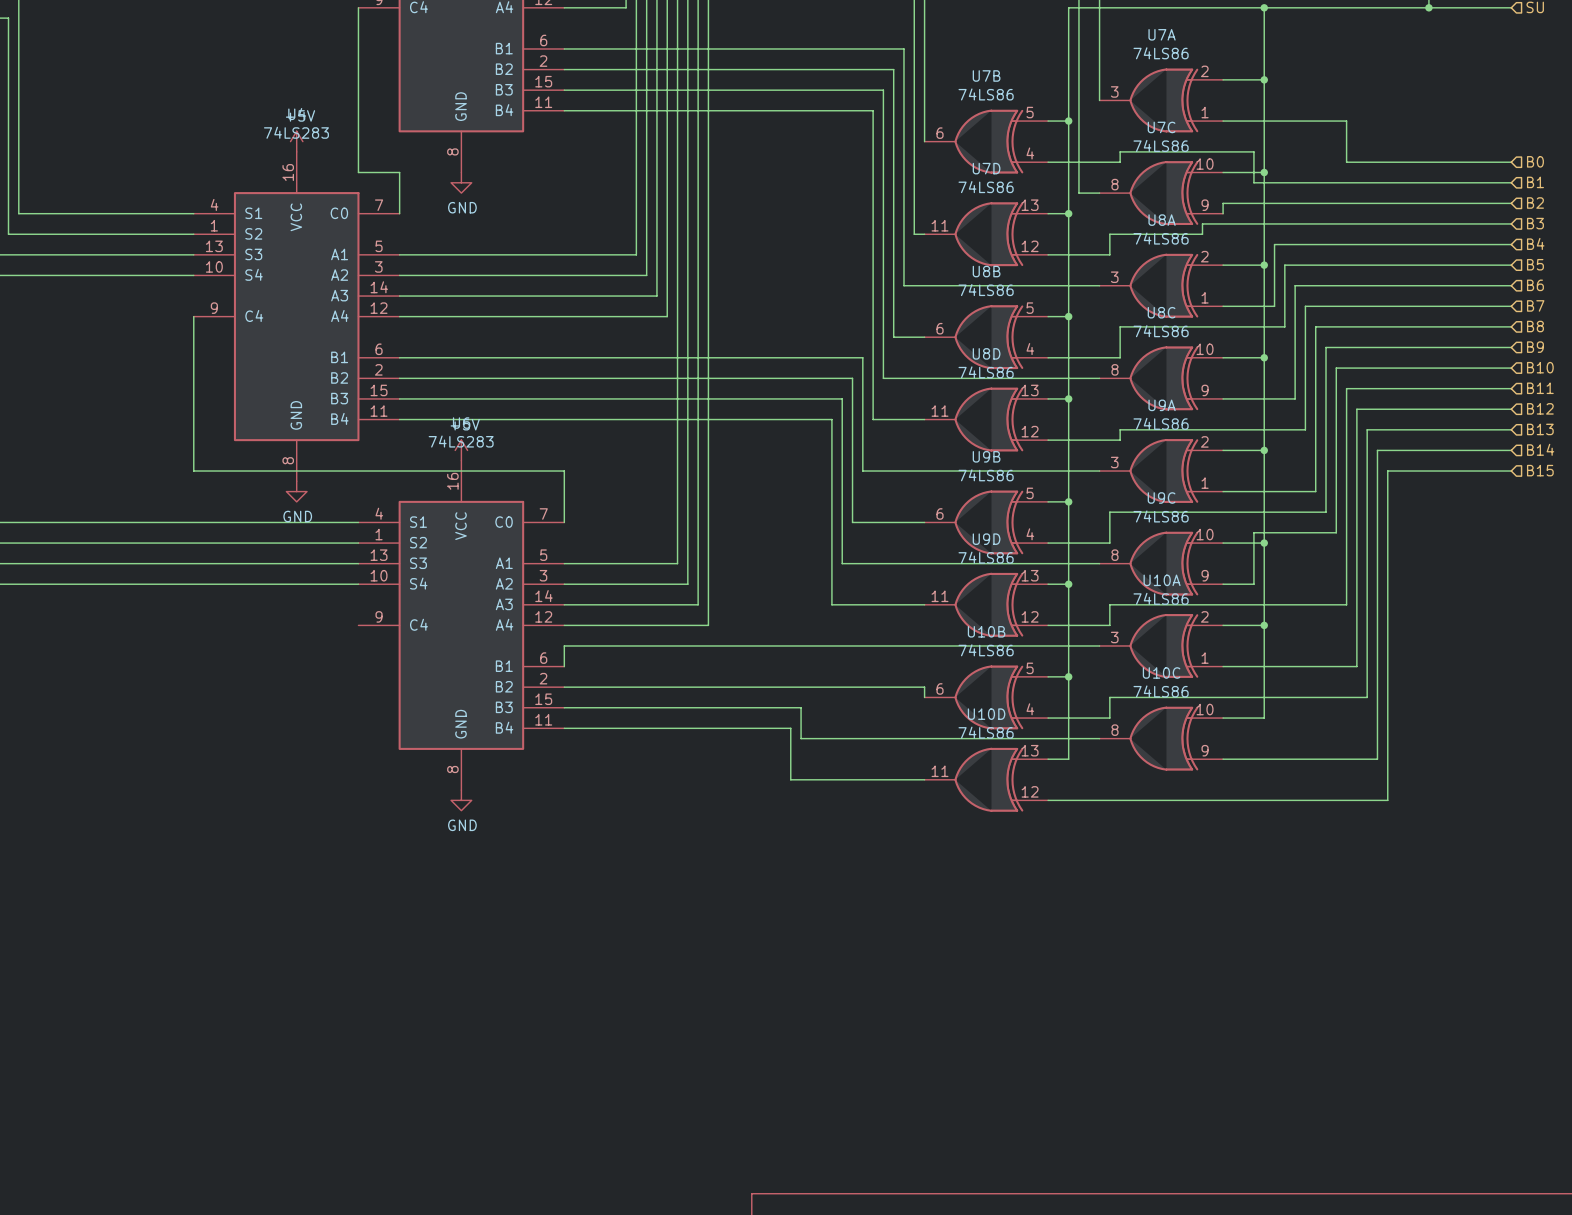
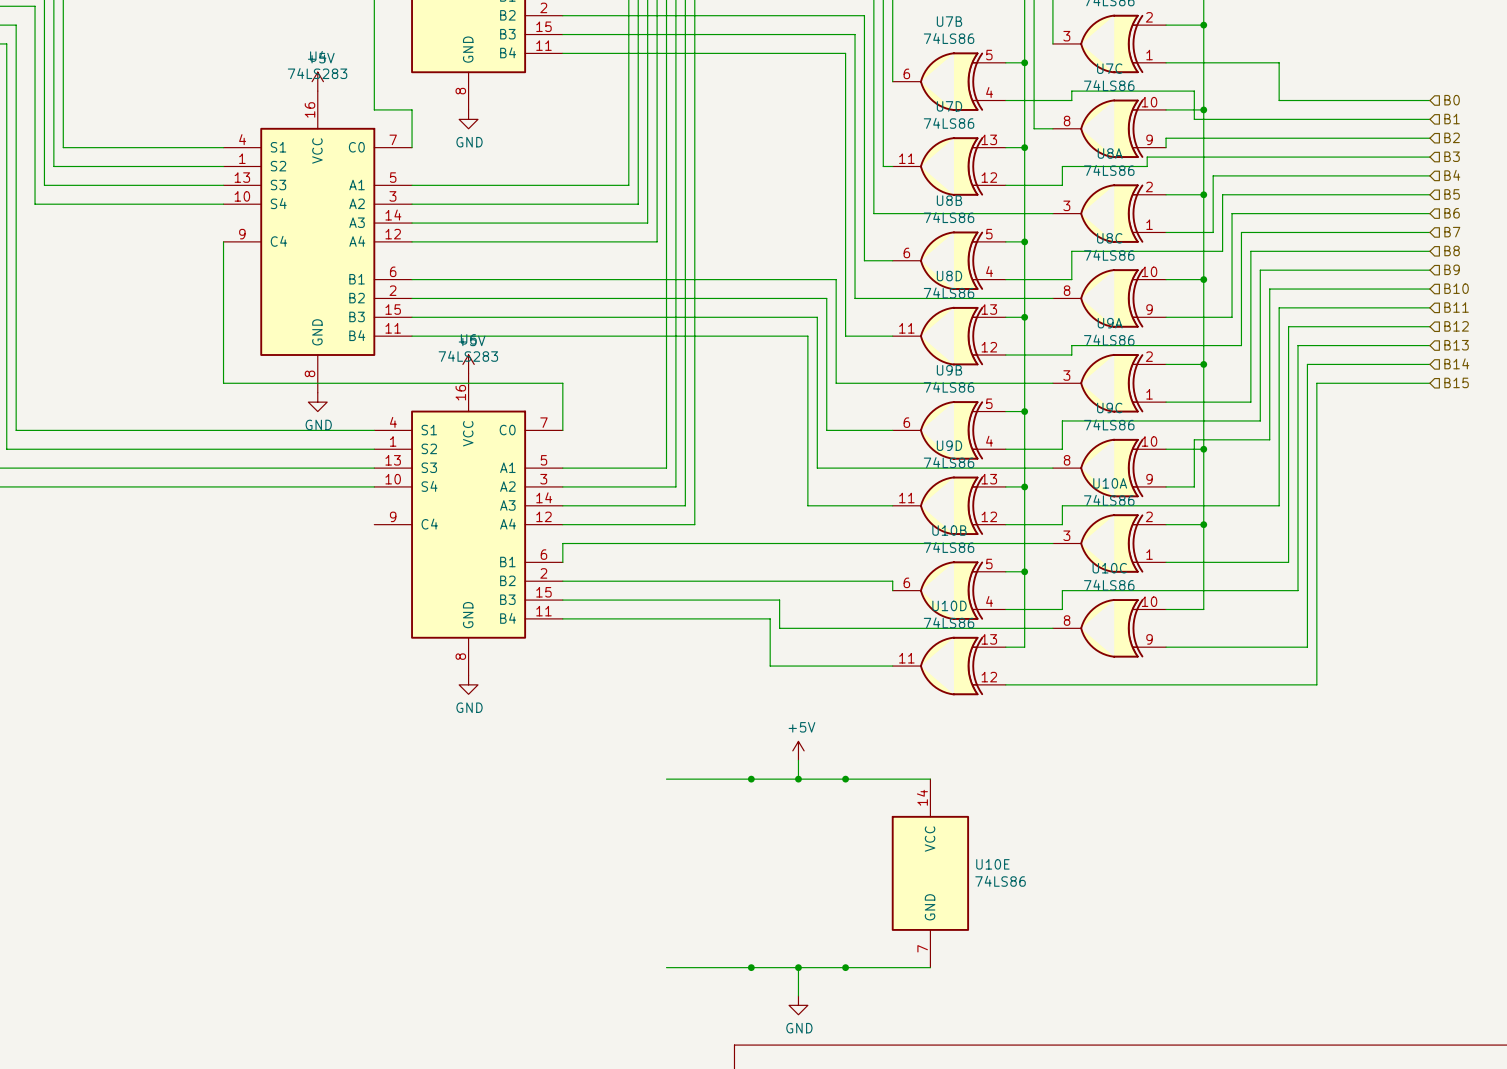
power symbol: none -> +5V (798, 750)
wire: none -> (798, 760) (798, 779)
wire: none -> (666, 779) (930, 779)
junction: none -> (751, 779)
junction: none -> (798, 779)
junction: none -> (845, 779)
U10E: none -> 74LS86 (930, 873)
wire: none -> (666, 967) (930, 967)
junction: none -> (751, 967)
wire: none -> (798, 967) (798, 995)
junction: none -> (798, 967)
junction: none -> (845, 967)
power symbol: none -> GND (798, 1005)

